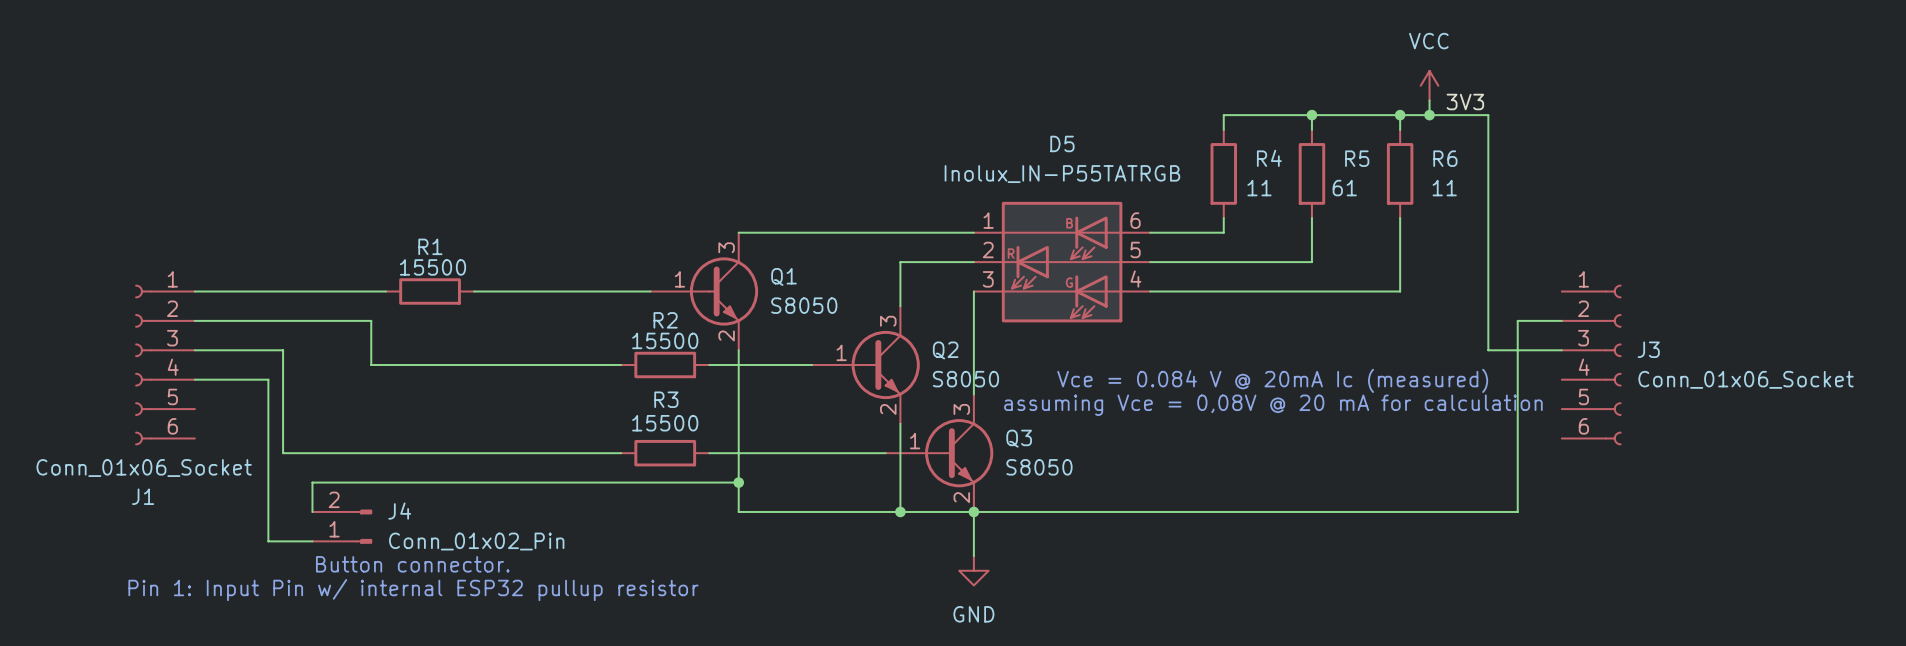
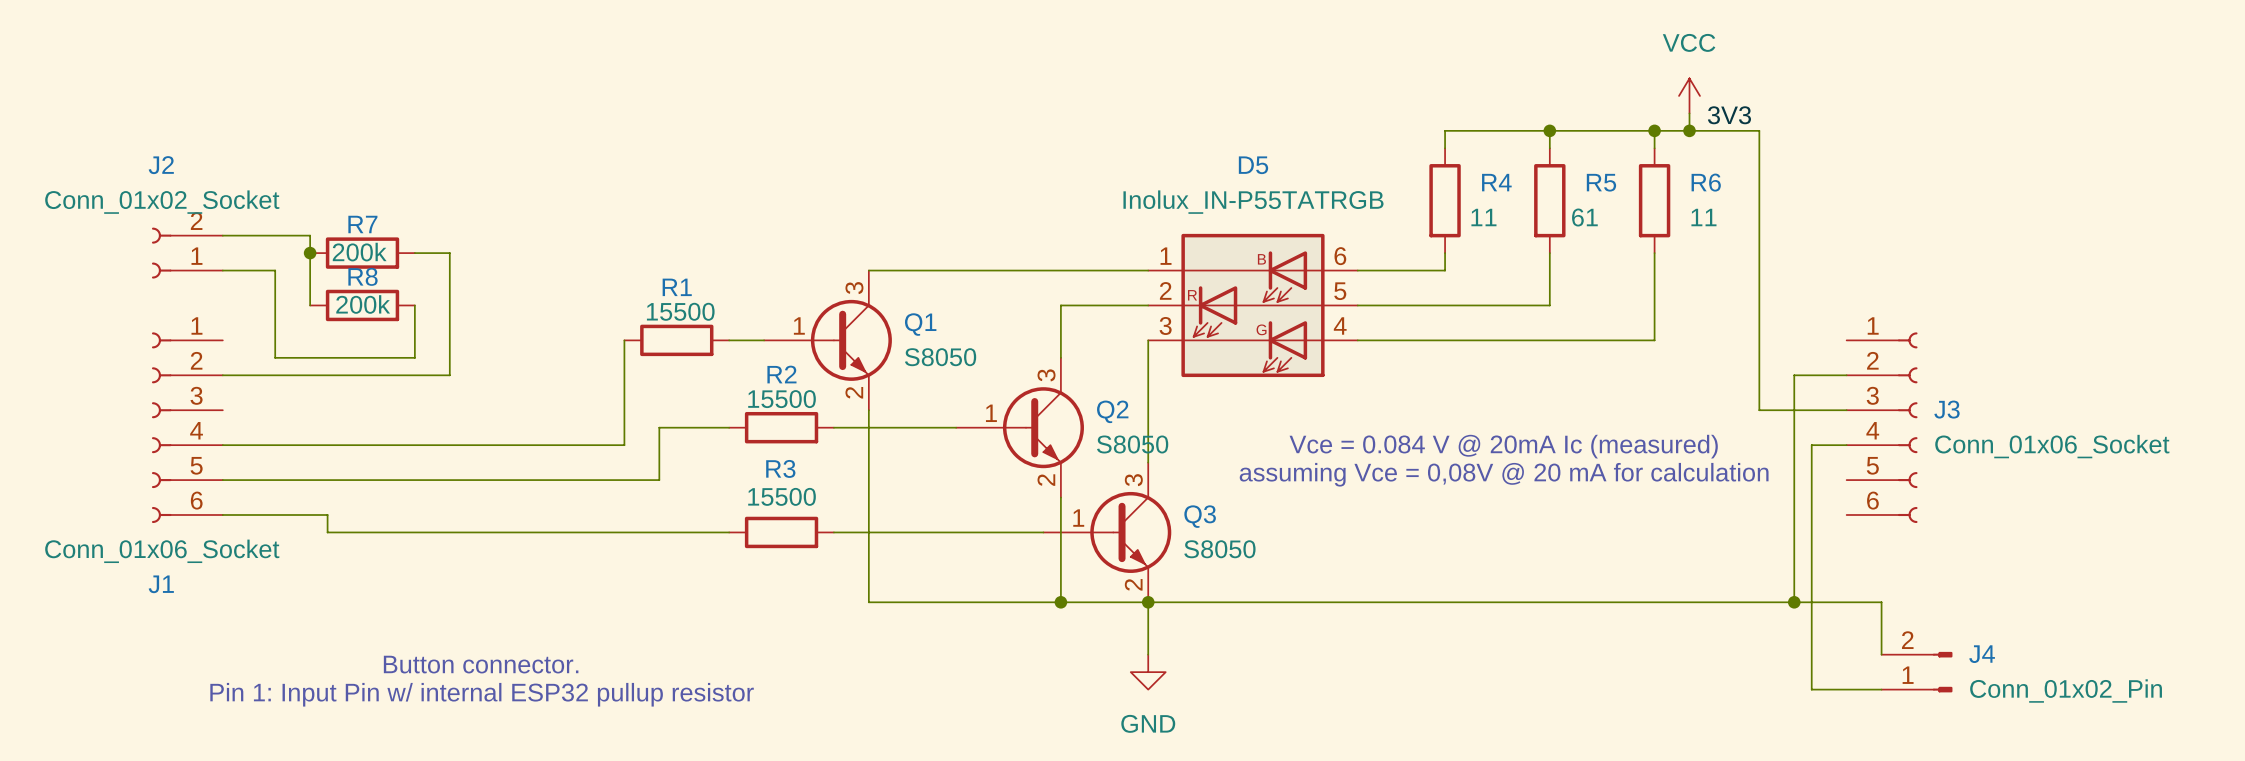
wire: none -> (222, 235) (310, 235) (310, 305)
J2: none -> Conn_01x02_Socket (187, 253)
junction: none -> (310, 253)
R7: none -> 200k (362, 253)
wire: none -> (414, 253) (449, 253) (449, 375) (432, 375)
wire: none -> (222, 270) (275, 270) (275, 357) (414, 357) (414, 305)
R8: none -> 200k (362, 305)
wire: (194, 291) (385, 291) -> none
R1 position: (430, 291) -> (676, 340)
wire: (474, 291) (621, 291) -> none
wire: (371, 320) (371, 364) (562, 364) -> (222, 480) (659, 480) (659, 427)
wire: (194, 350) (283, 350) (283, 438) -> (222, 514) (327, 514)
wire: (268, 379) (268, 541) (312, 541) -> (310, 445) (624, 445) (624, 340)
wire: none -> (1846, 445) (1811, 445) (1811, 689) (1881, 689)
wire: (738, 482) (312, 482) (312, 511) -> none
junction: (738, 482) -> none
wire: none -> (1794, 602) (1881, 602) (1881, 654)
junction: none -> (1794, 602)
J4 position: (342, 526) -> (1917, 672)

